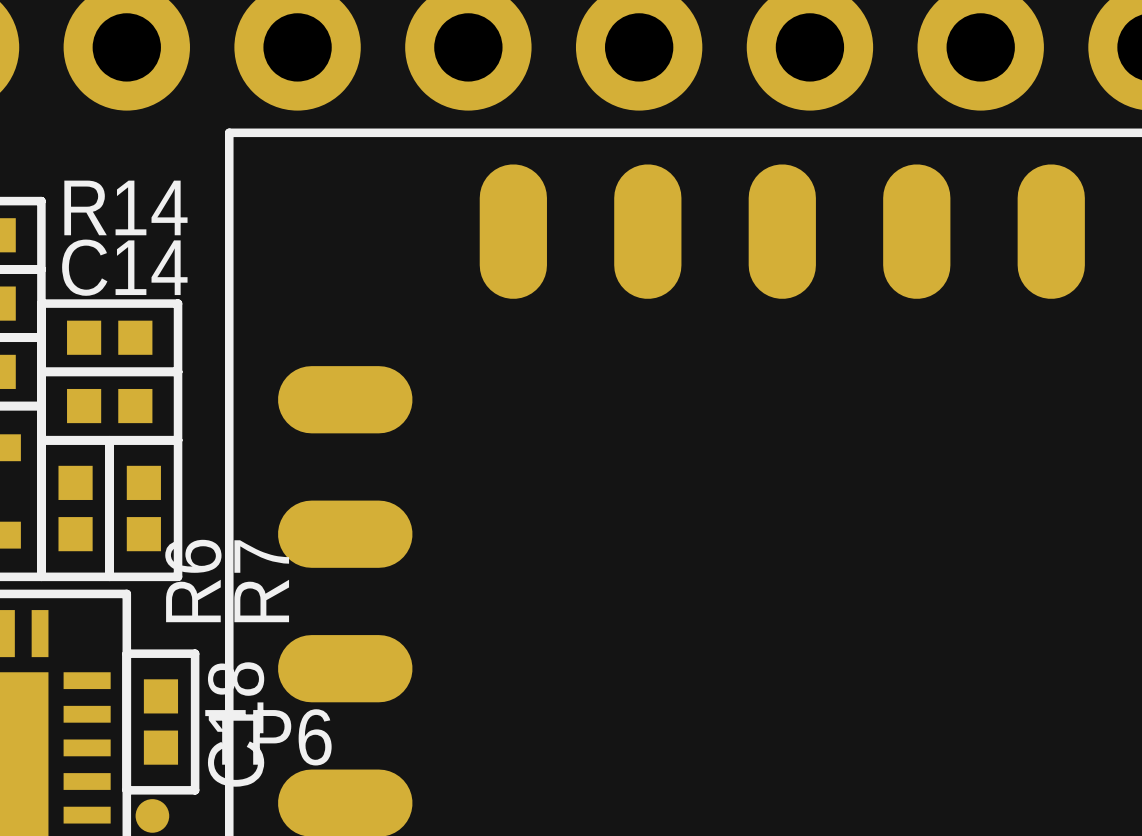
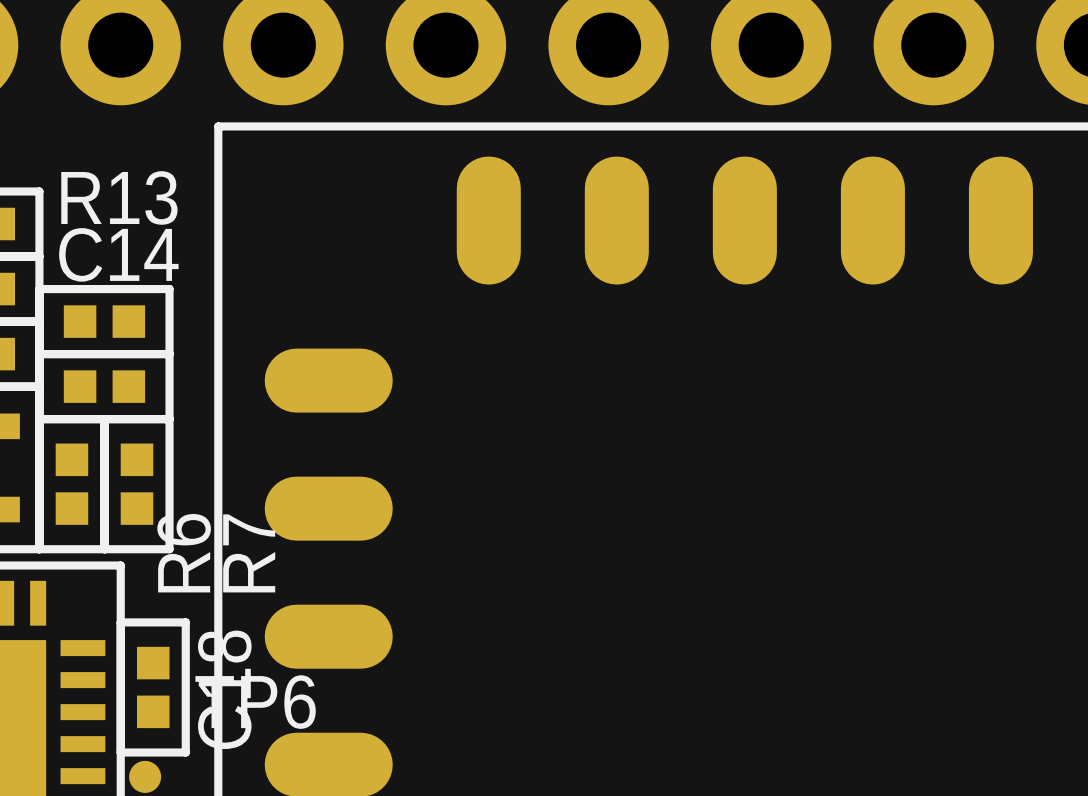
R14 name: R14 (125, 207) -> R13 (119, 197)

